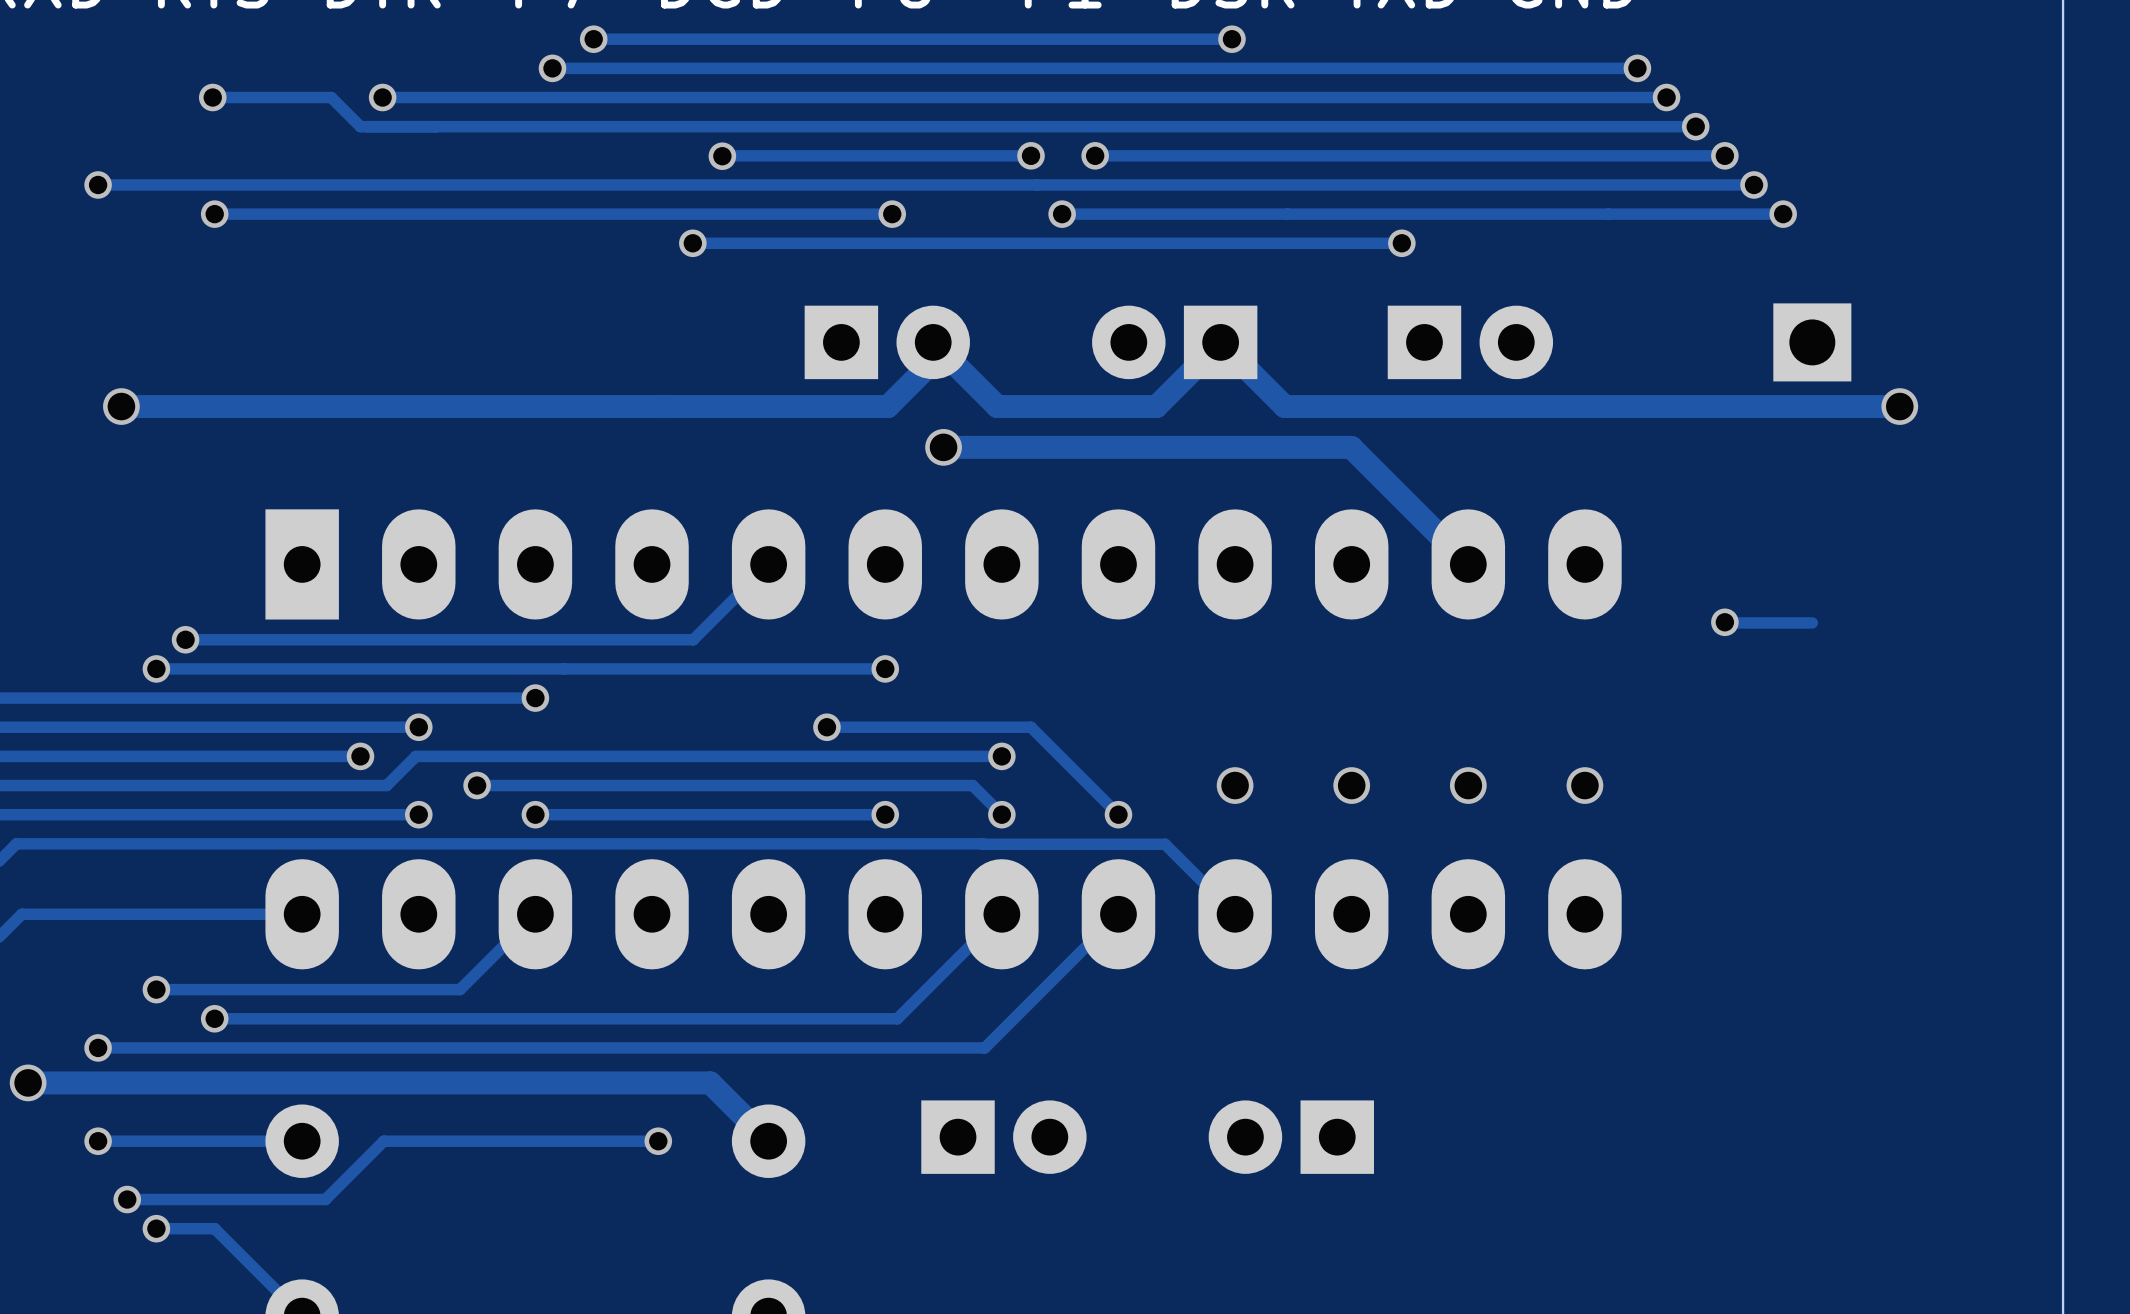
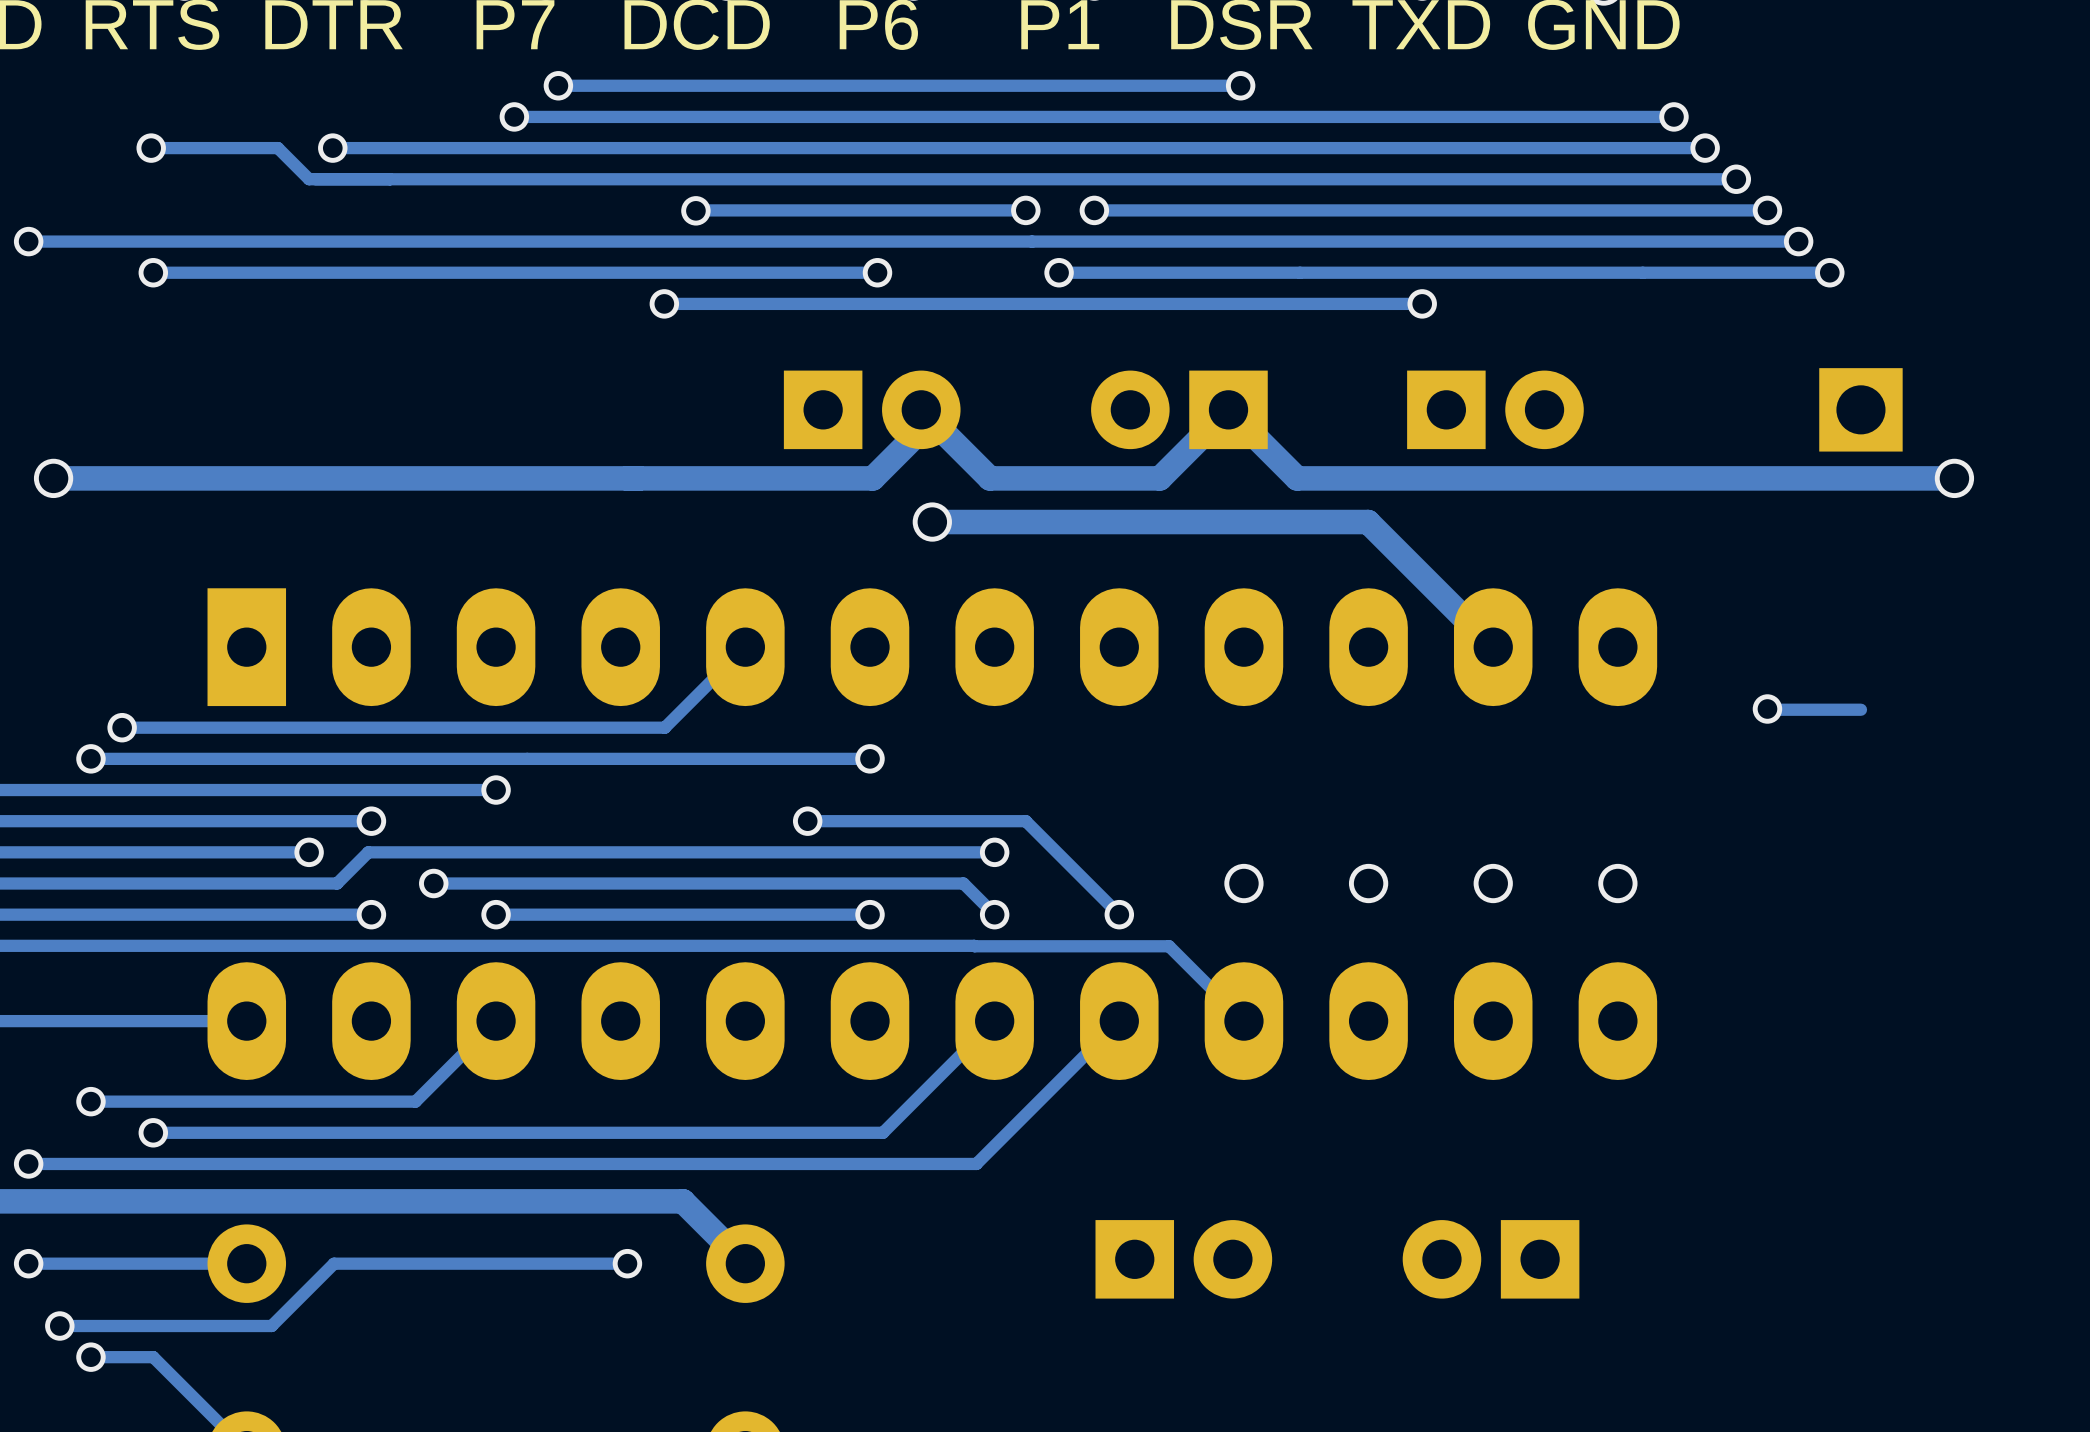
part: (1003, 1137) -> none
part: none -> (1183, 1259)
part: (1291, 1137) -> none
part: none -> (1491, 1259)

